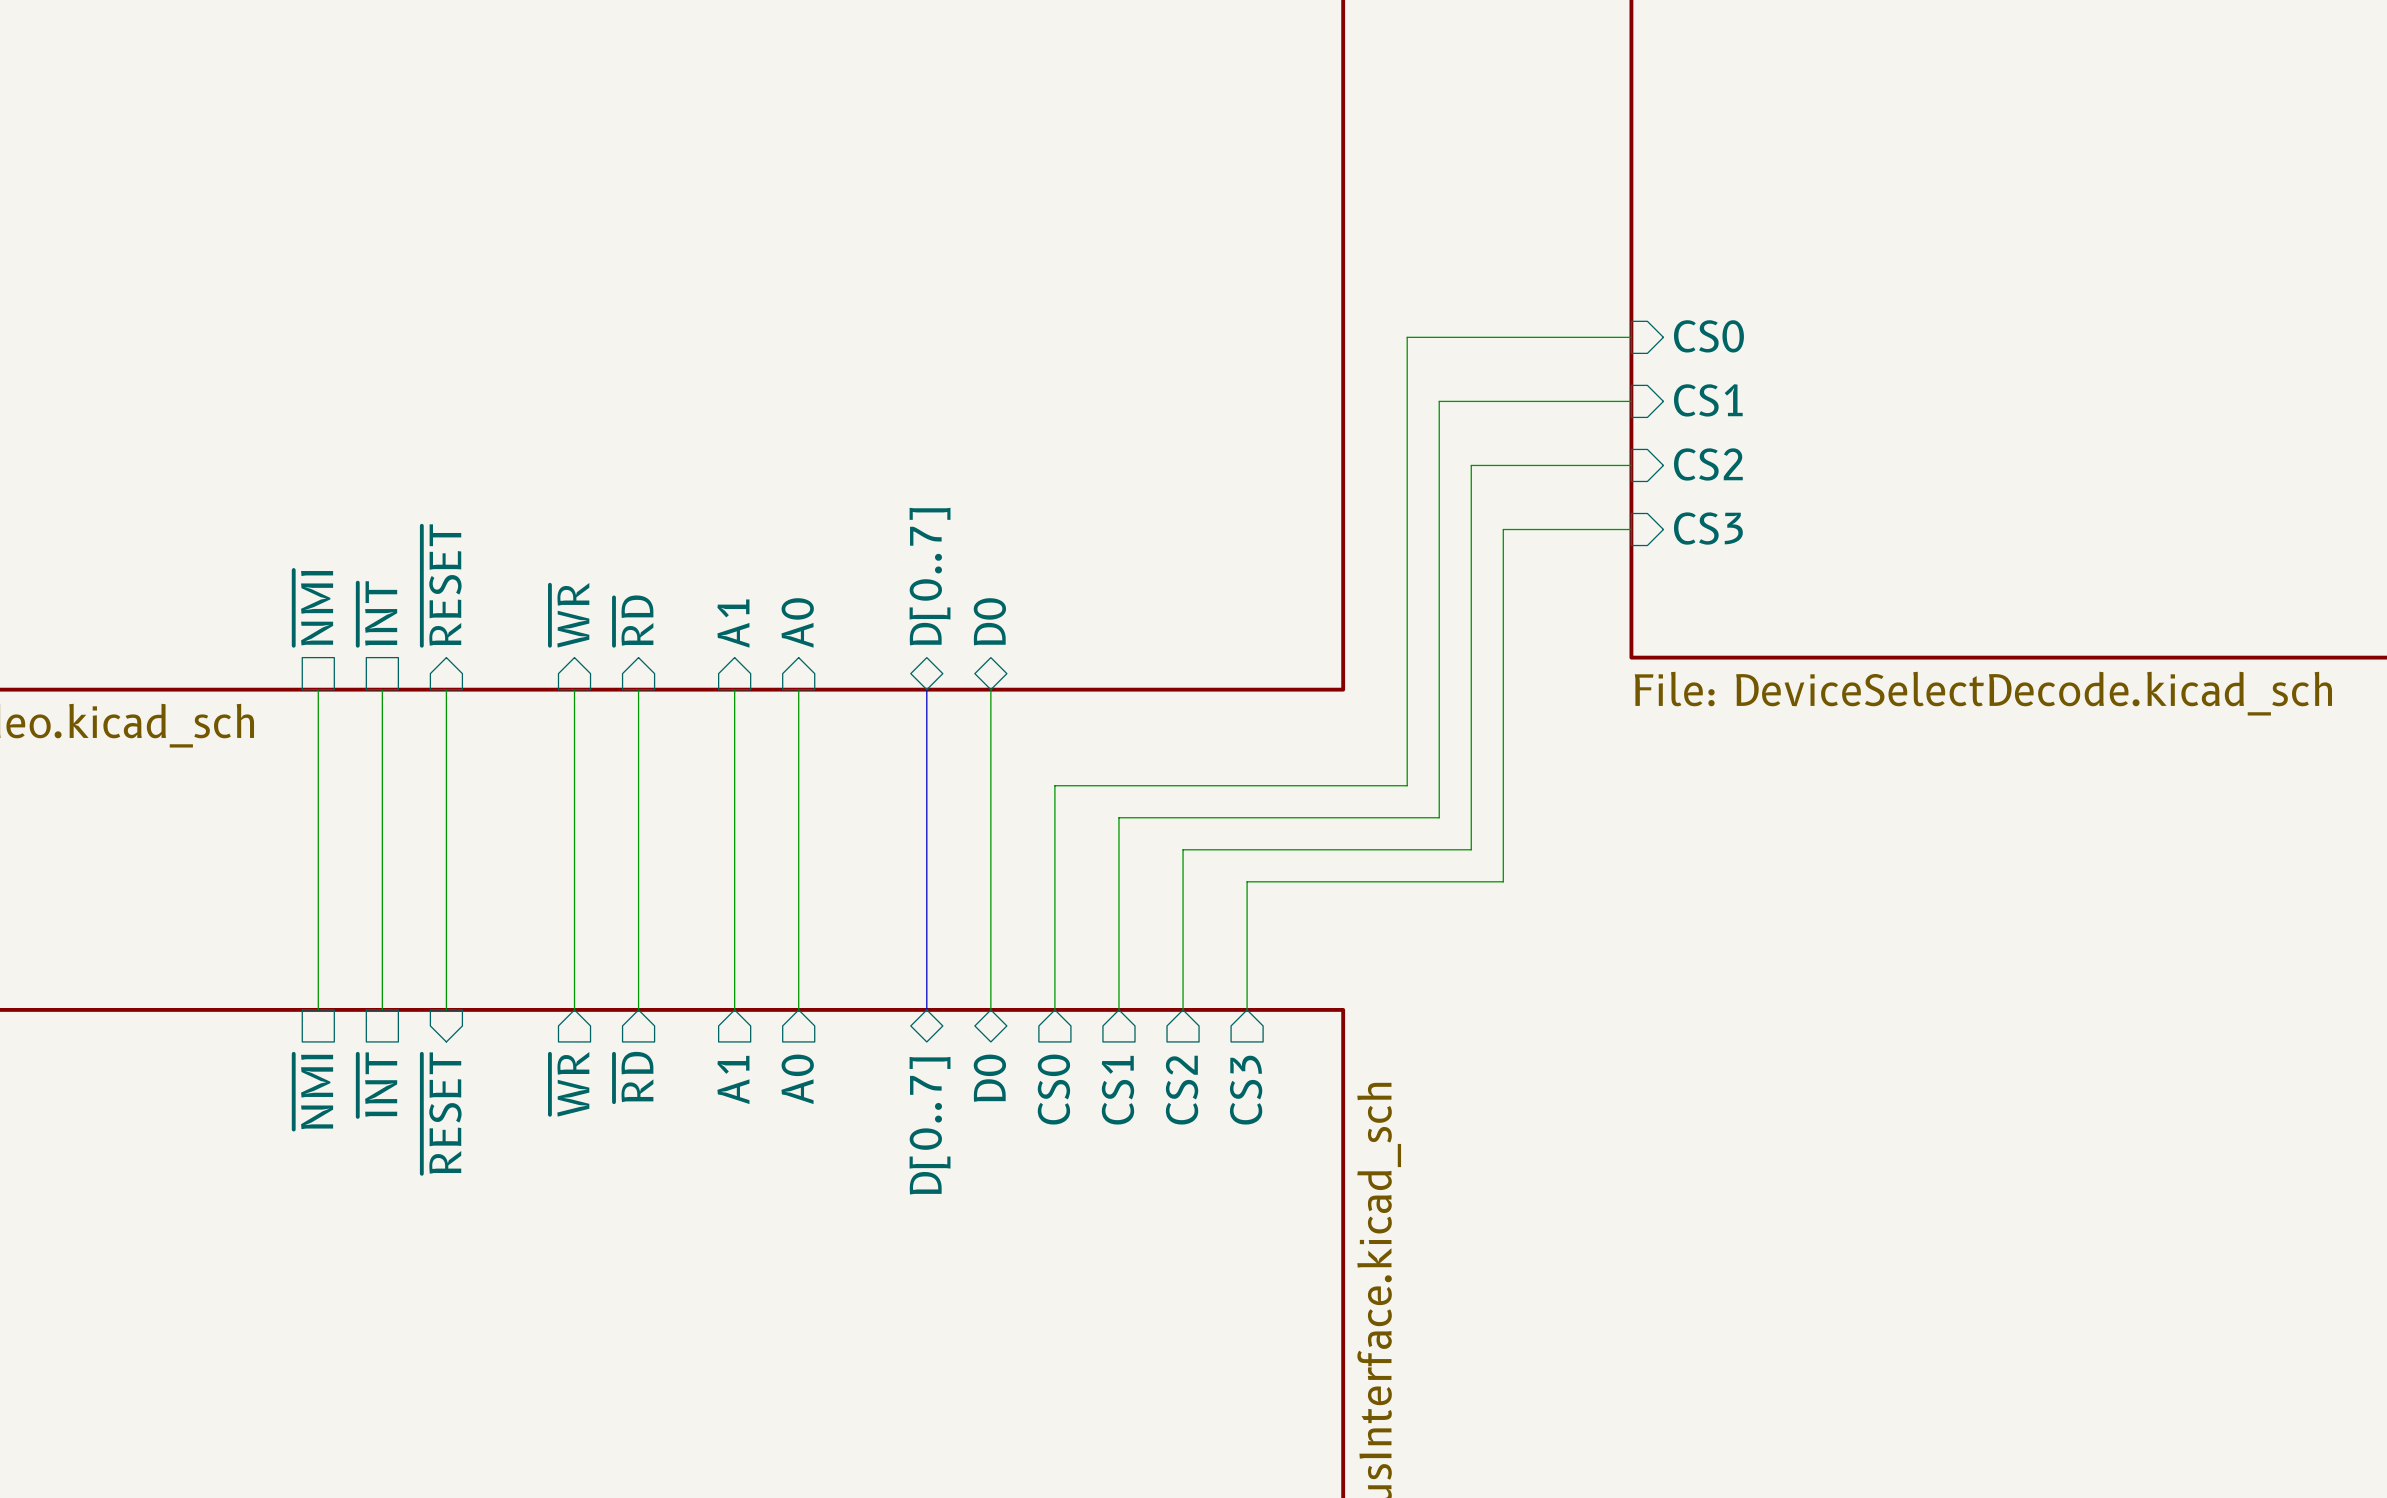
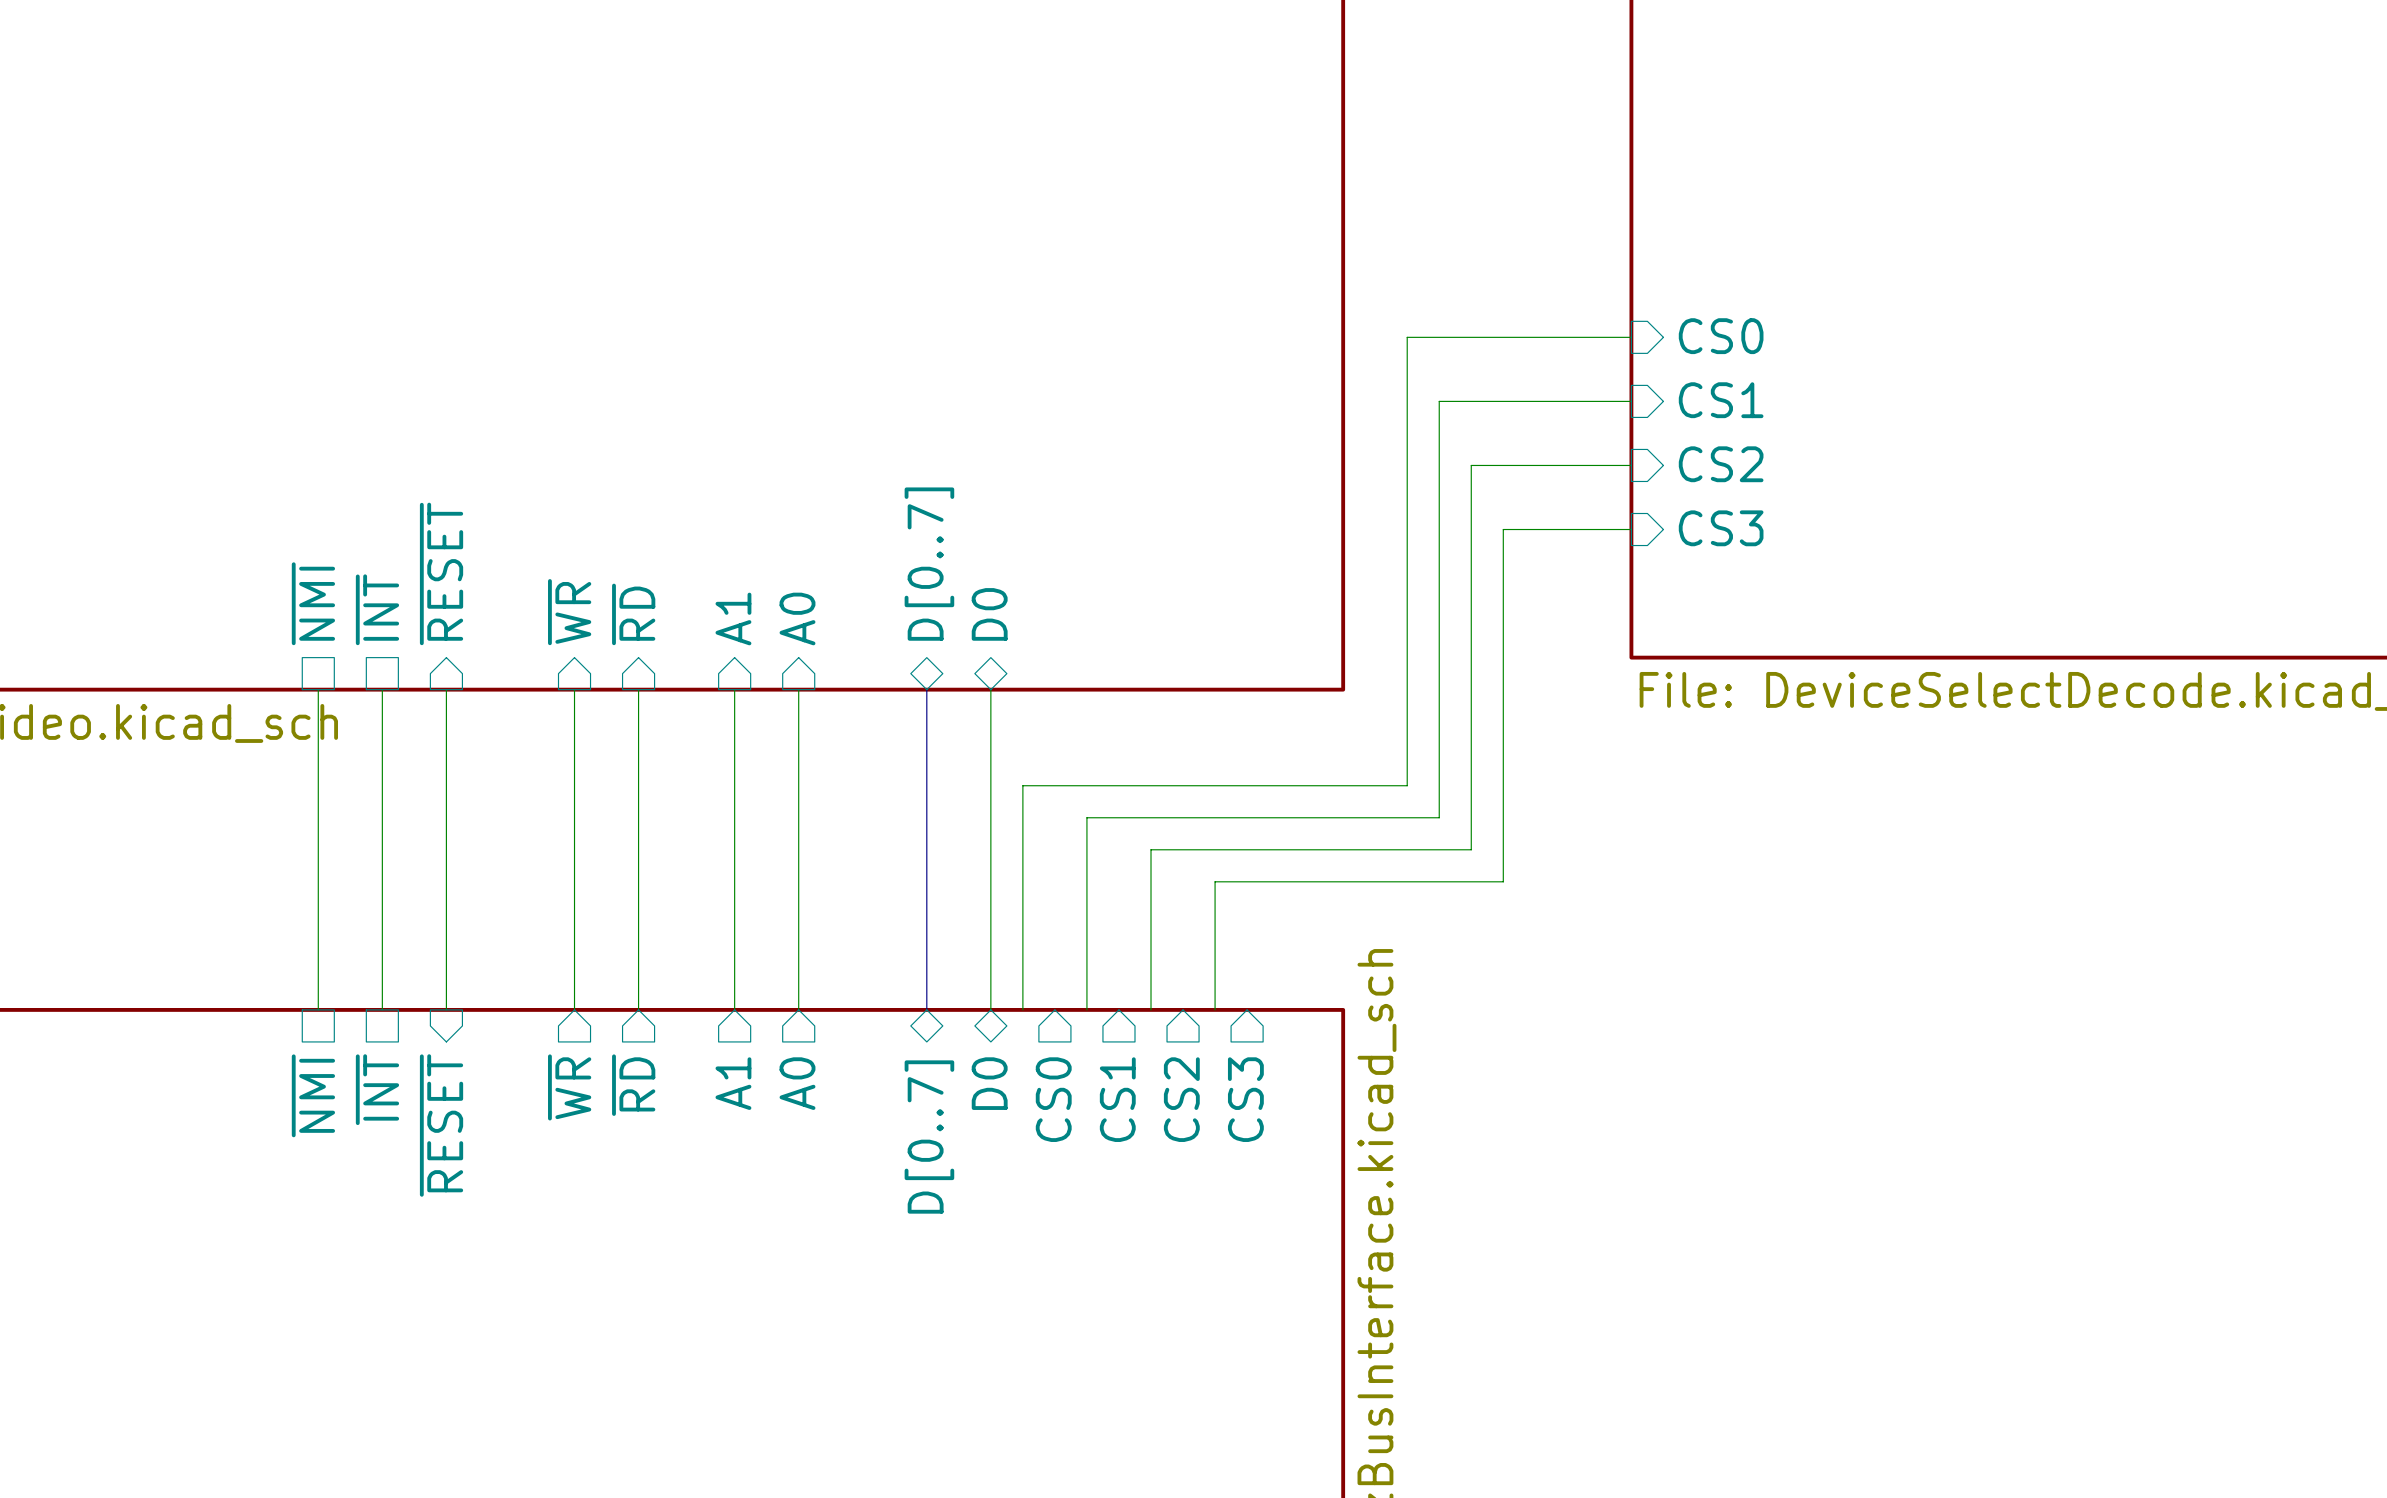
wire: (1054, 785) (1054, 1009) -> (1054, 785) (1022, 785) (1022, 1009)
wire: (1118, 817) (1118, 1009) -> (1118, 817) (1086, 817) (1086, 1009)
wire: (1183, 849) (1183, 1009) -> (1183, 849) (1151, 849) (1151, 1009)
wire: (1247, 881) (1247, 1009) -> (1247, 881) (1215, 881) (1215, 1009)

